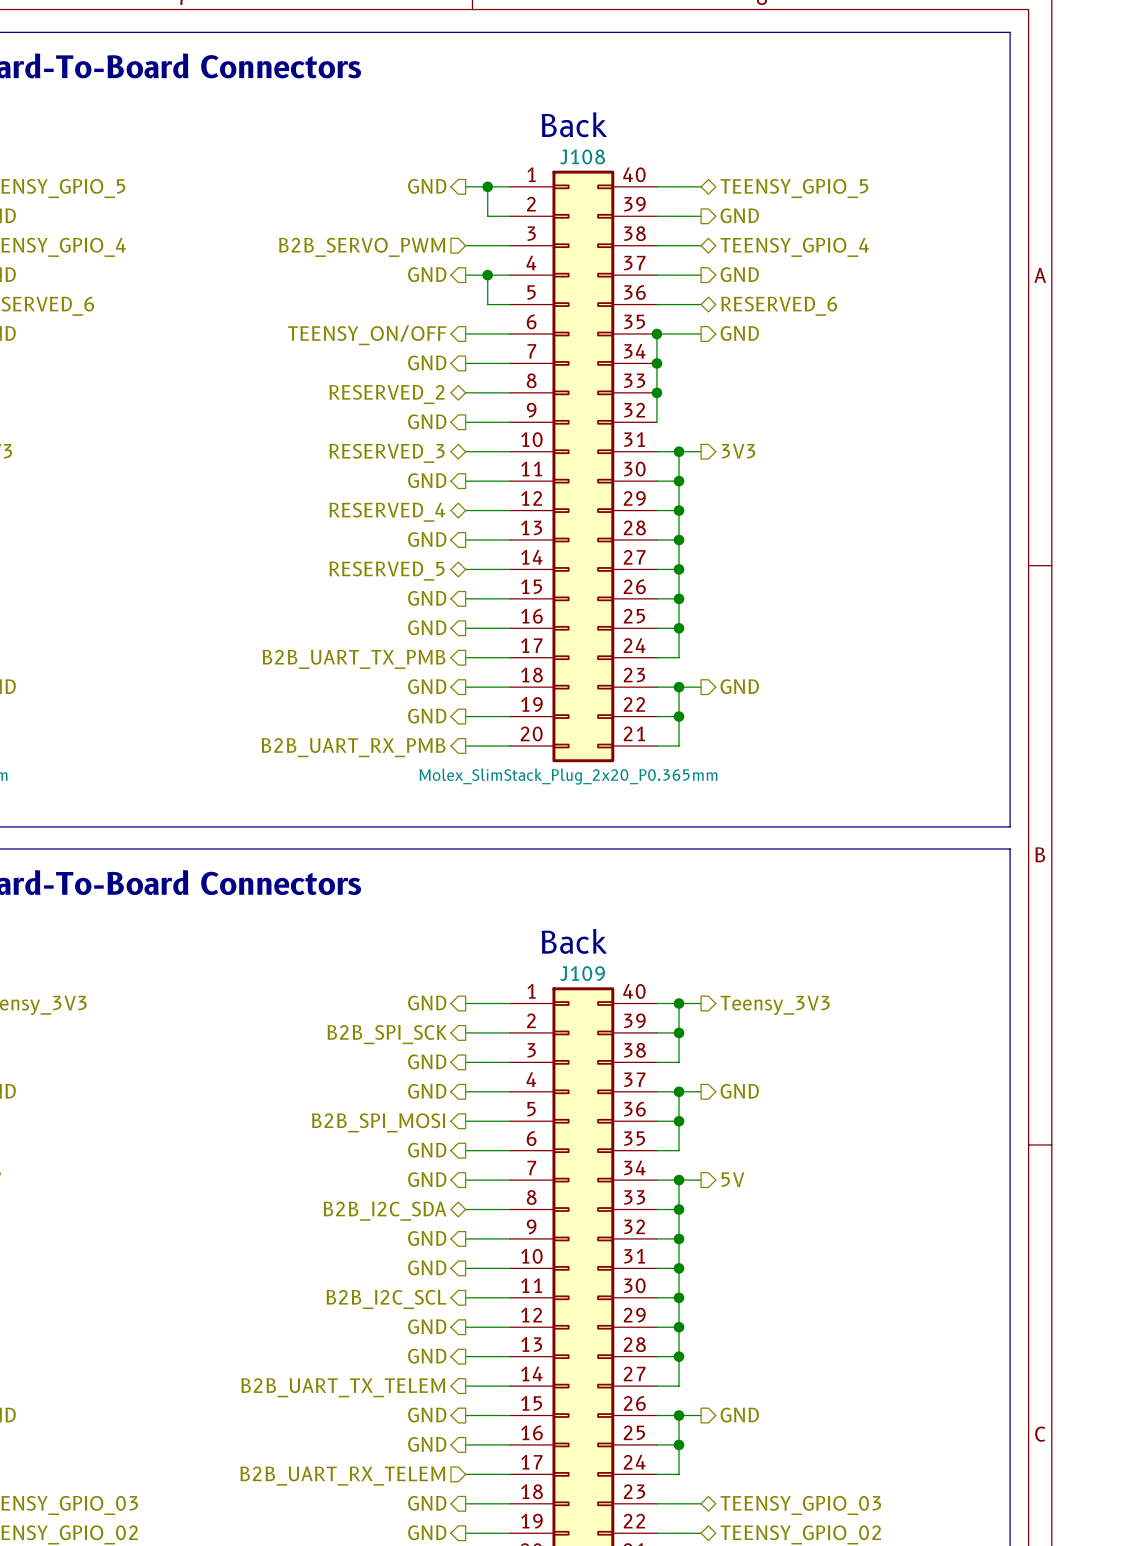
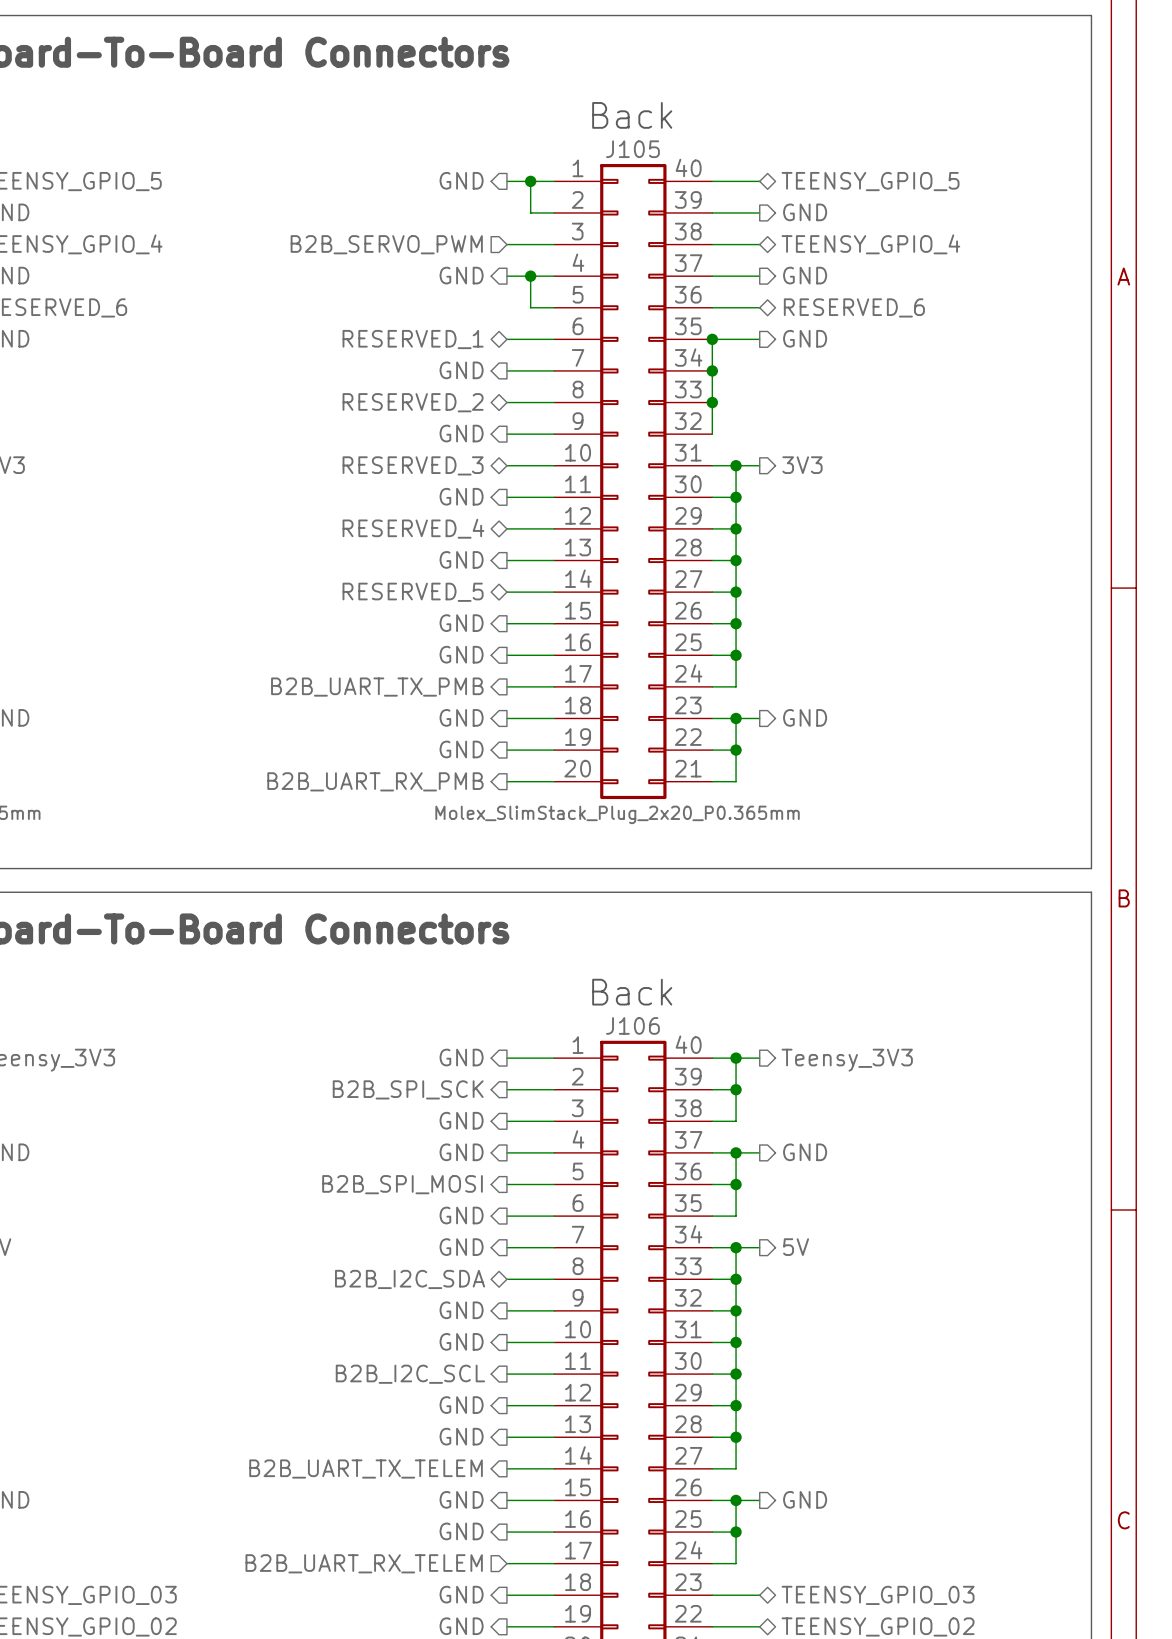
J108 name: J108 (582, 156) -> J105 (632, 149)
hierarchical label shape: output (367, 335) -> bidirectional (413, 339)
hierarchical label: TEENSY_ON/OFF (367, 335) -> RESERVED_1 (413, 339)
J109 name: J109 (582, 973) -> J106 (632, 1025)

